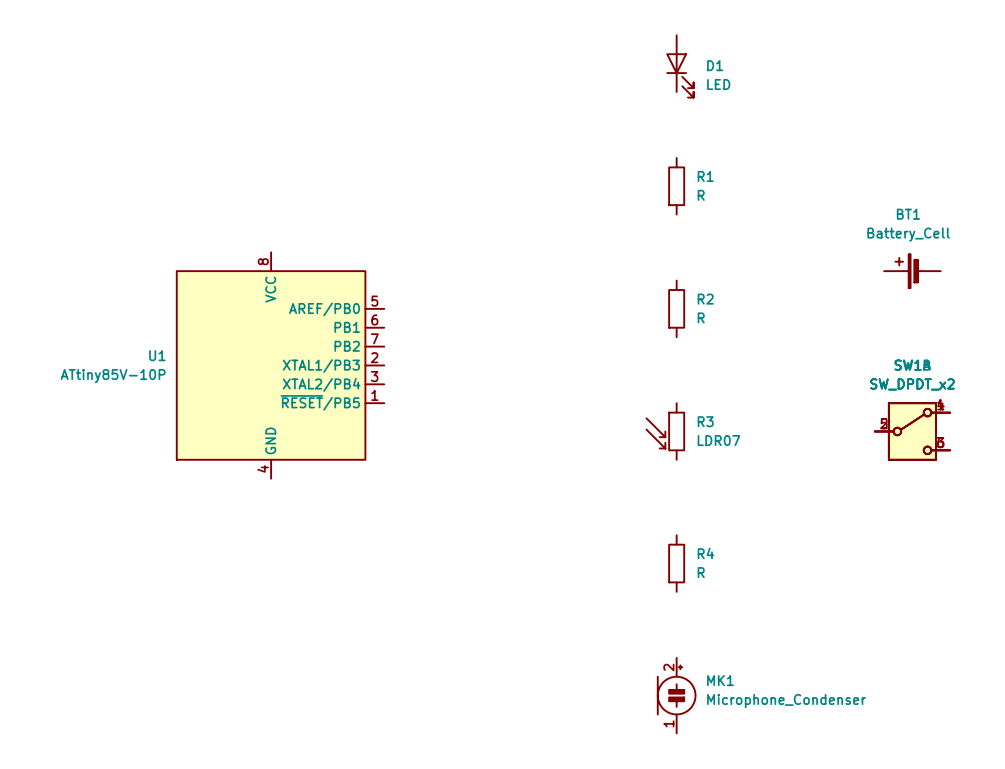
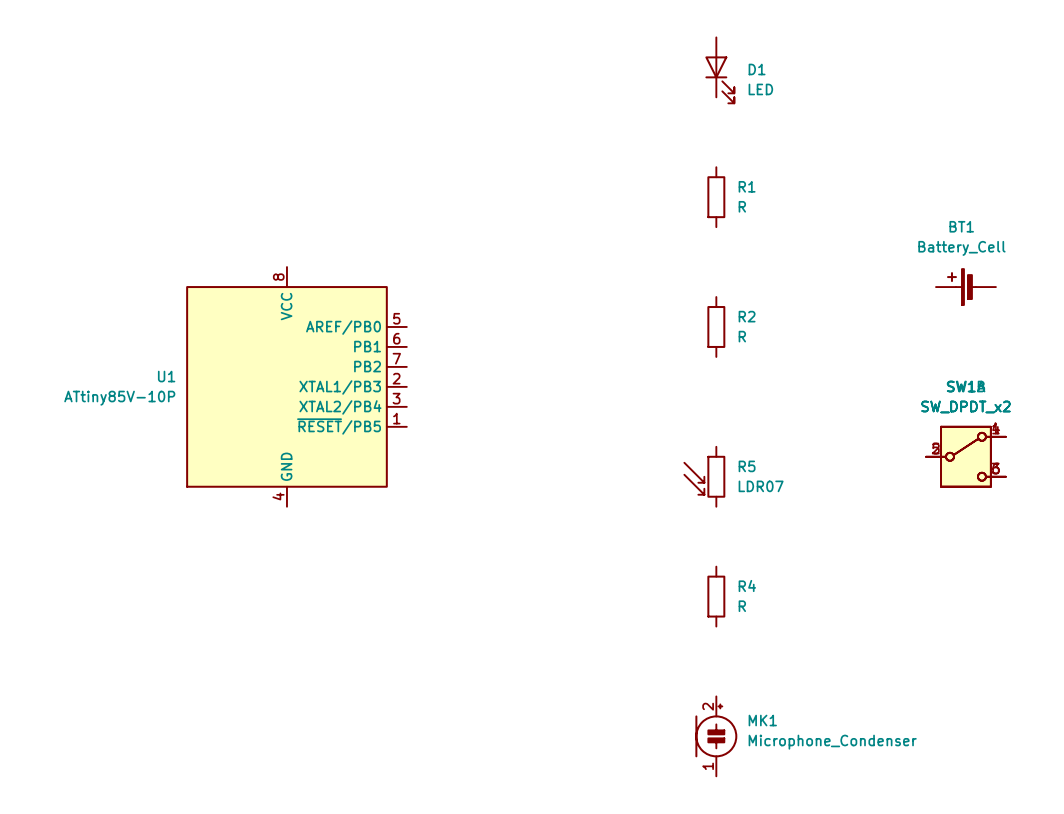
R3: LDR07 (665, 431) -> none
R5: none -> LDR07 (704, 476)

